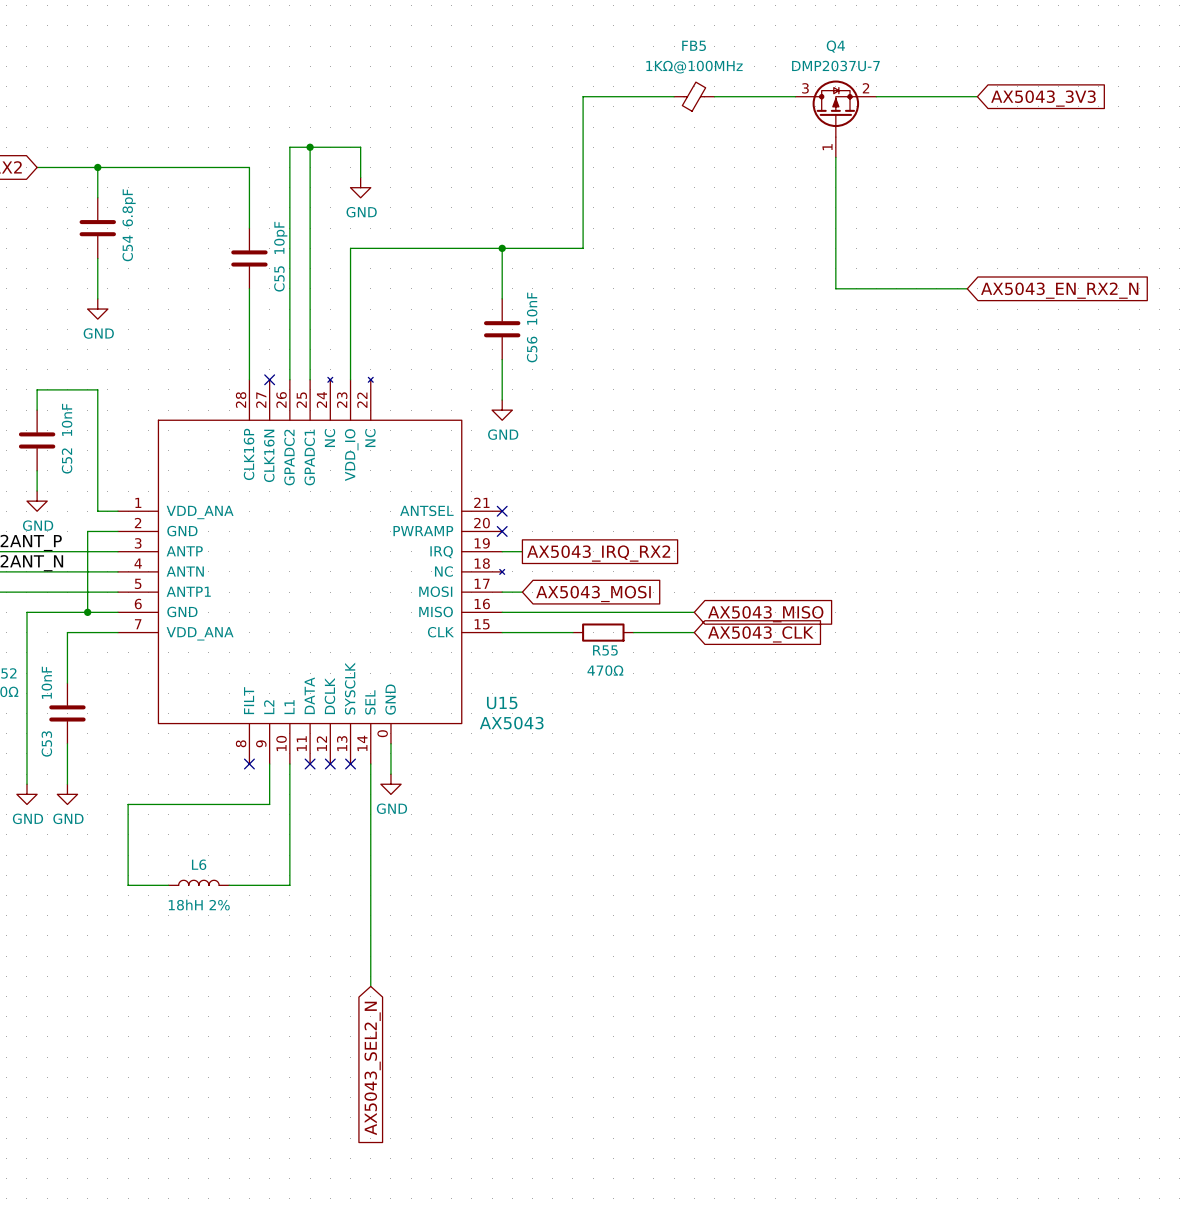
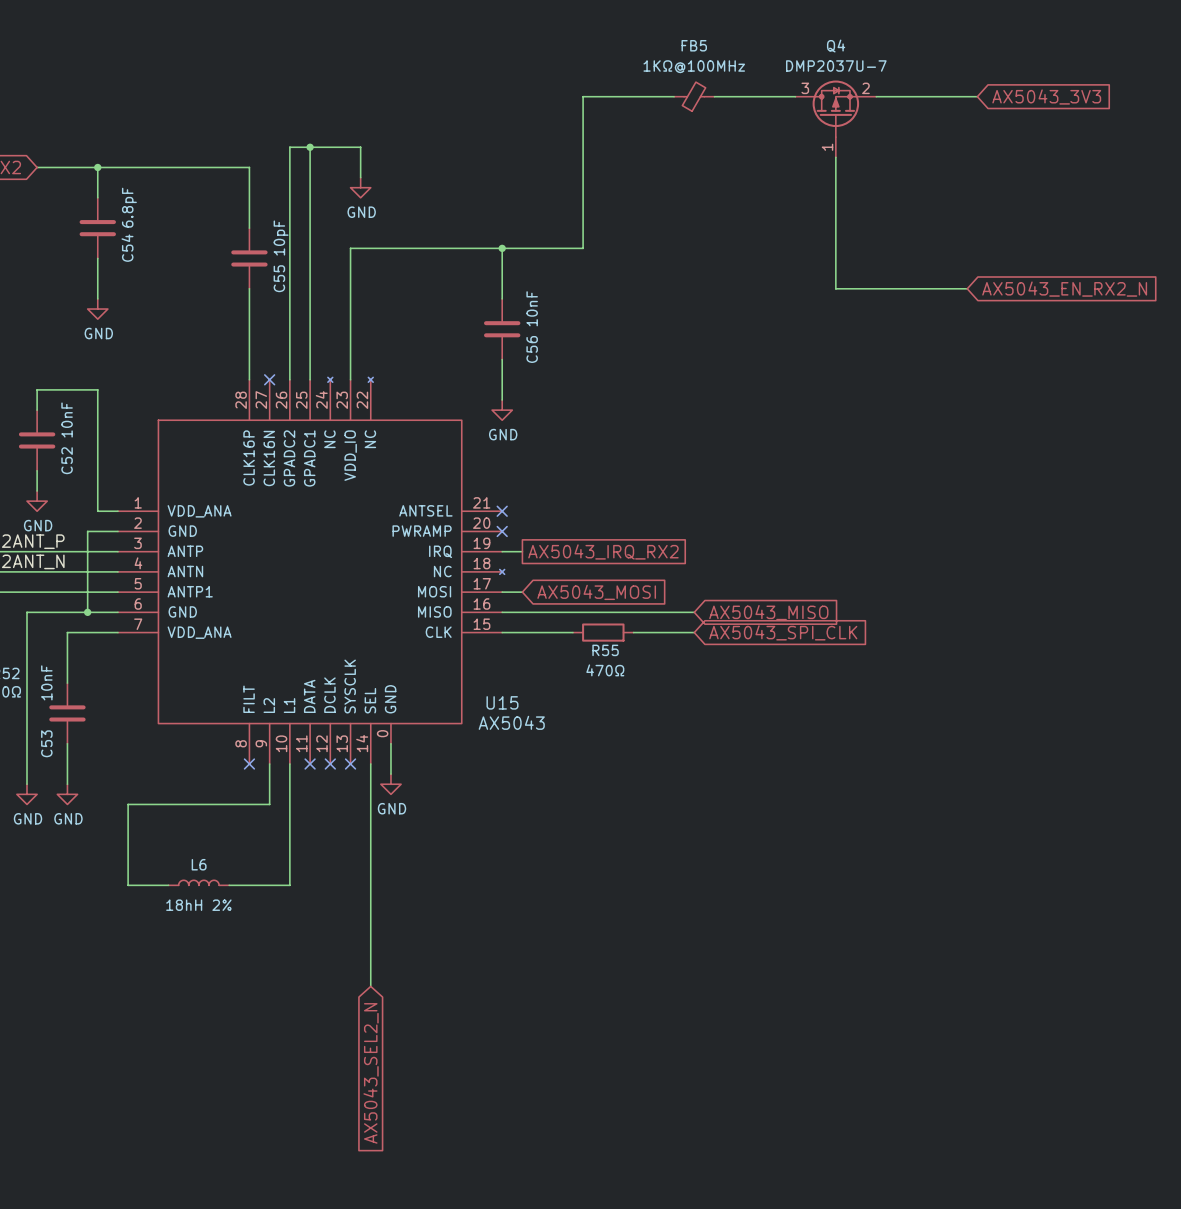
global label: AX5043_CLK (760, 634) -> AX5043_SPI_CLK (783, 632)

